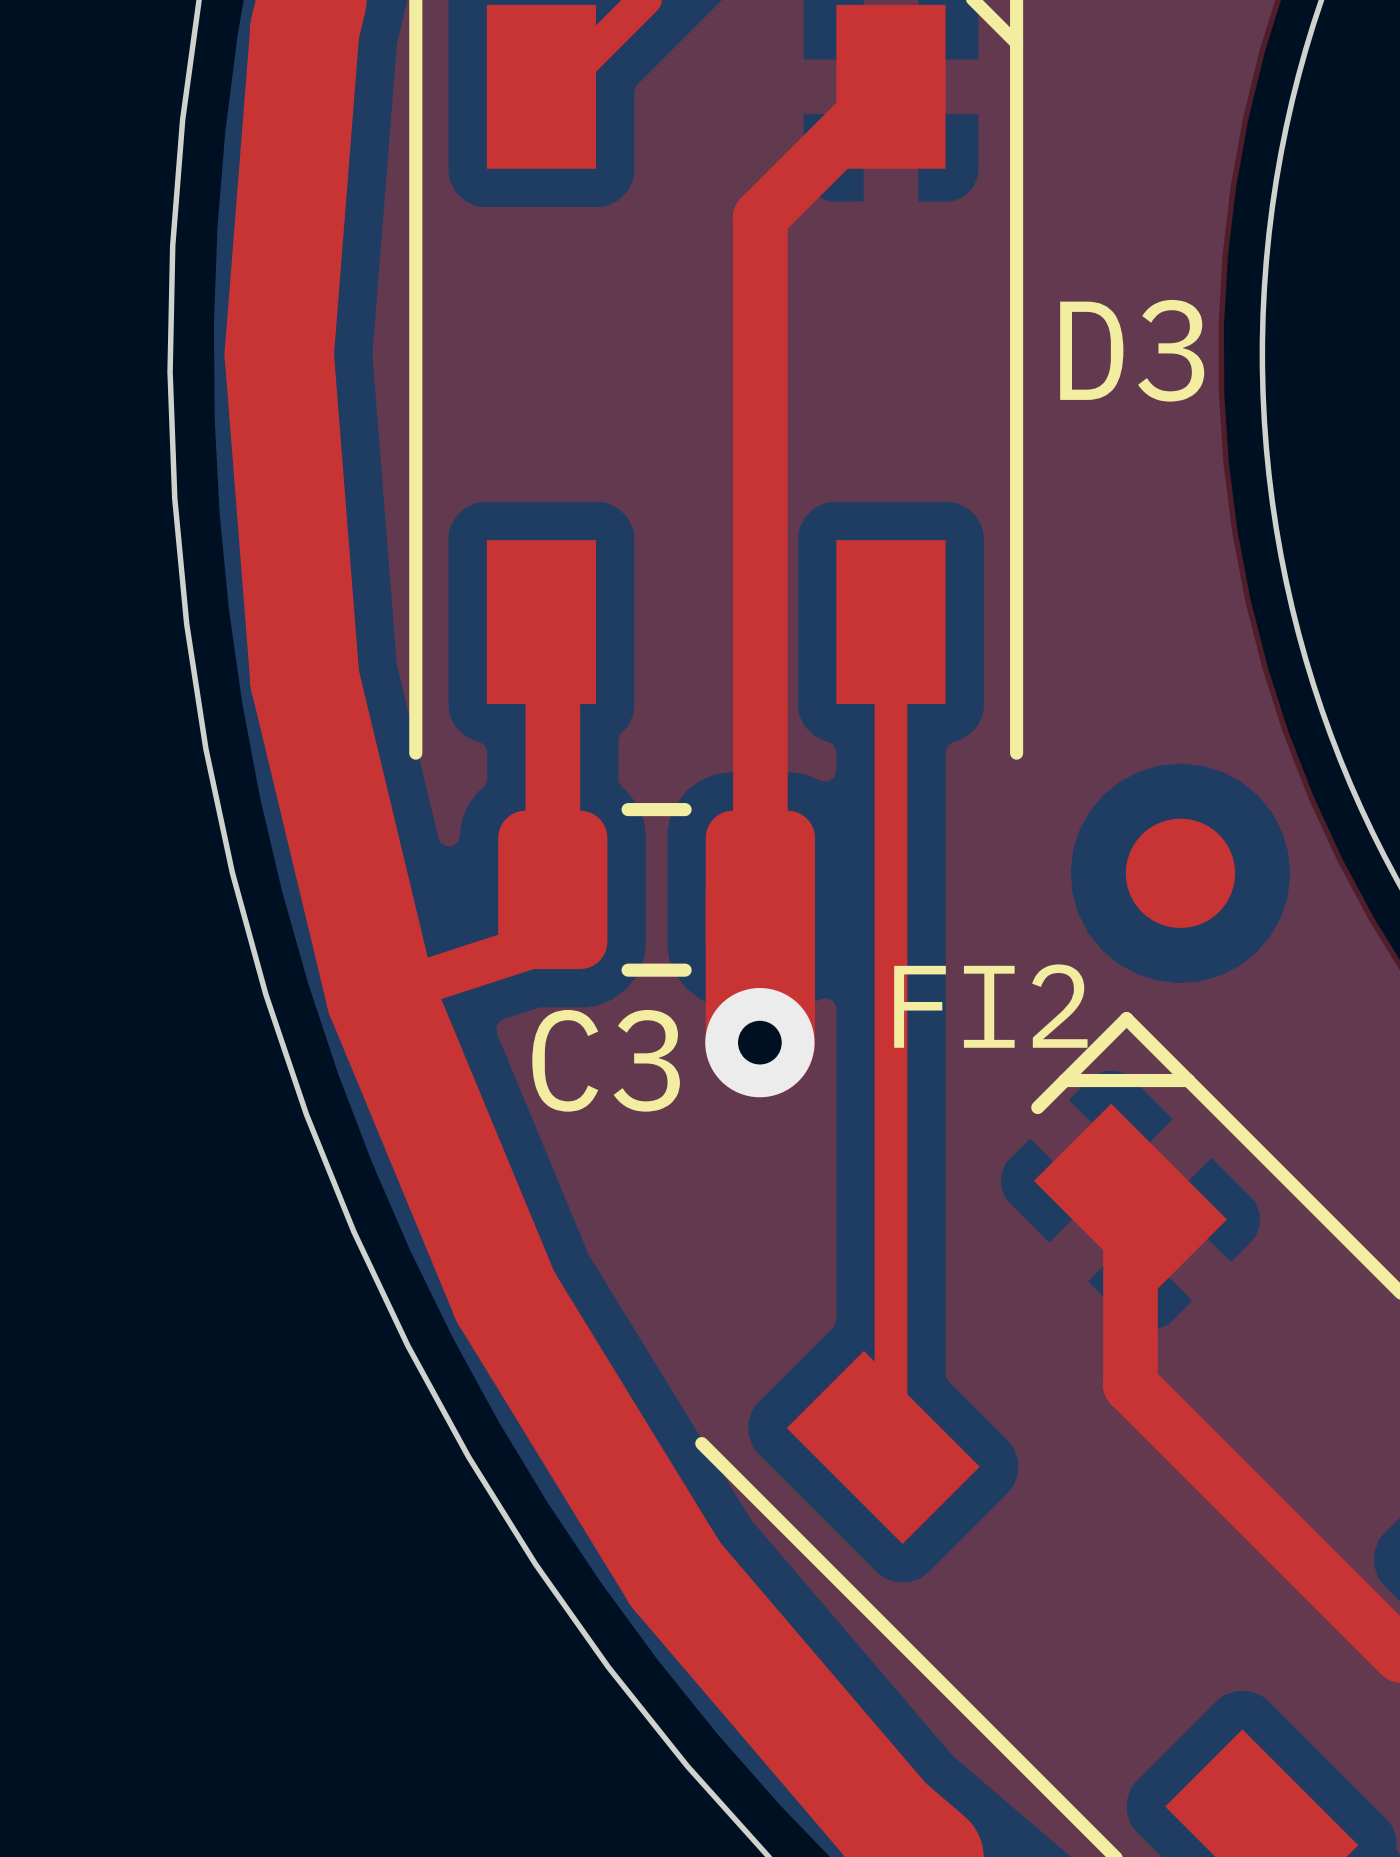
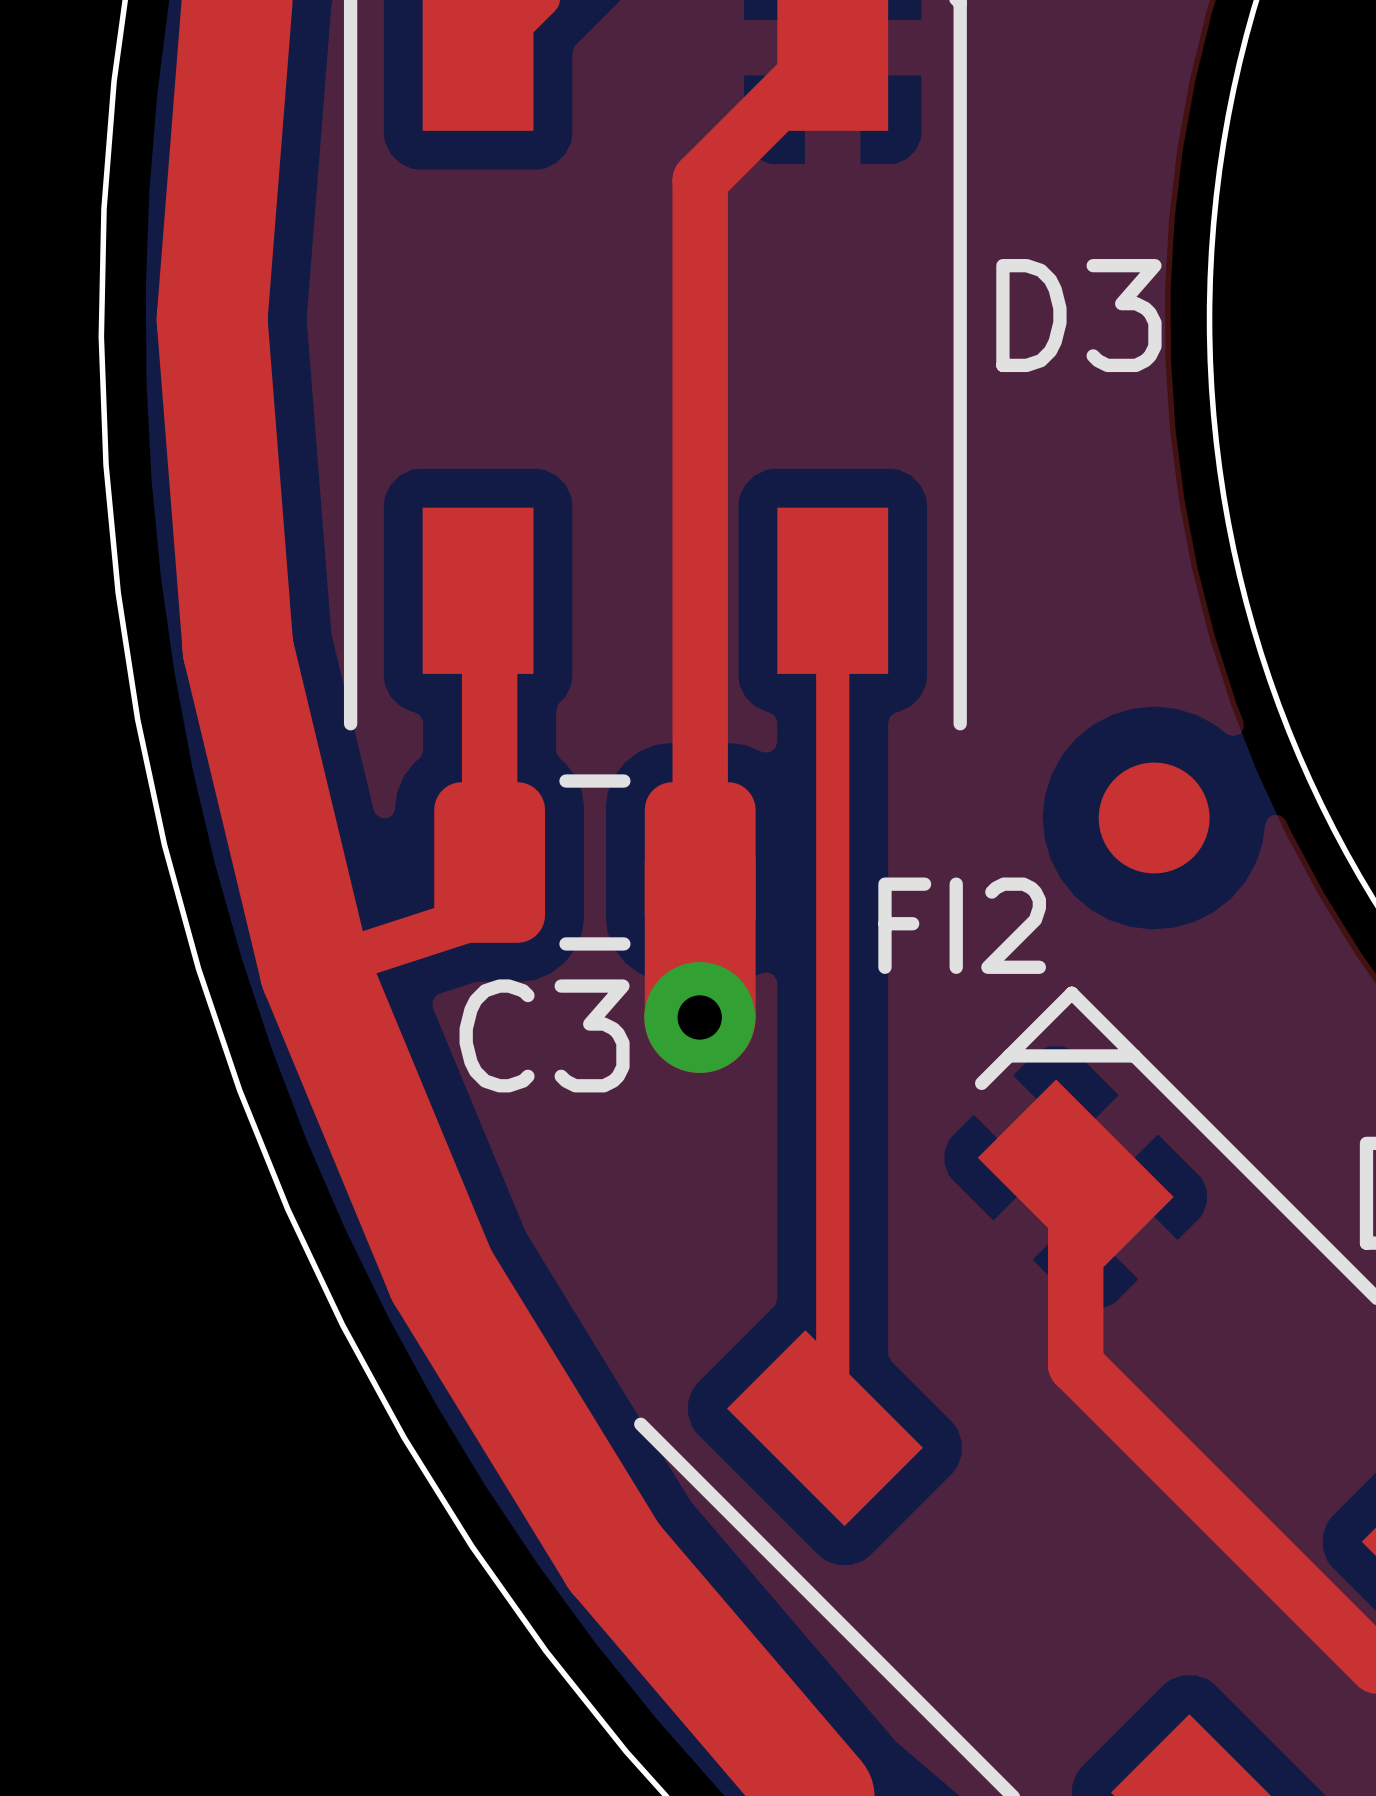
FI2 position: (1180, 873) -> (1154, 817)
FI2 name position: FI2 (990, 1006) -> FI2 (962, 925)

